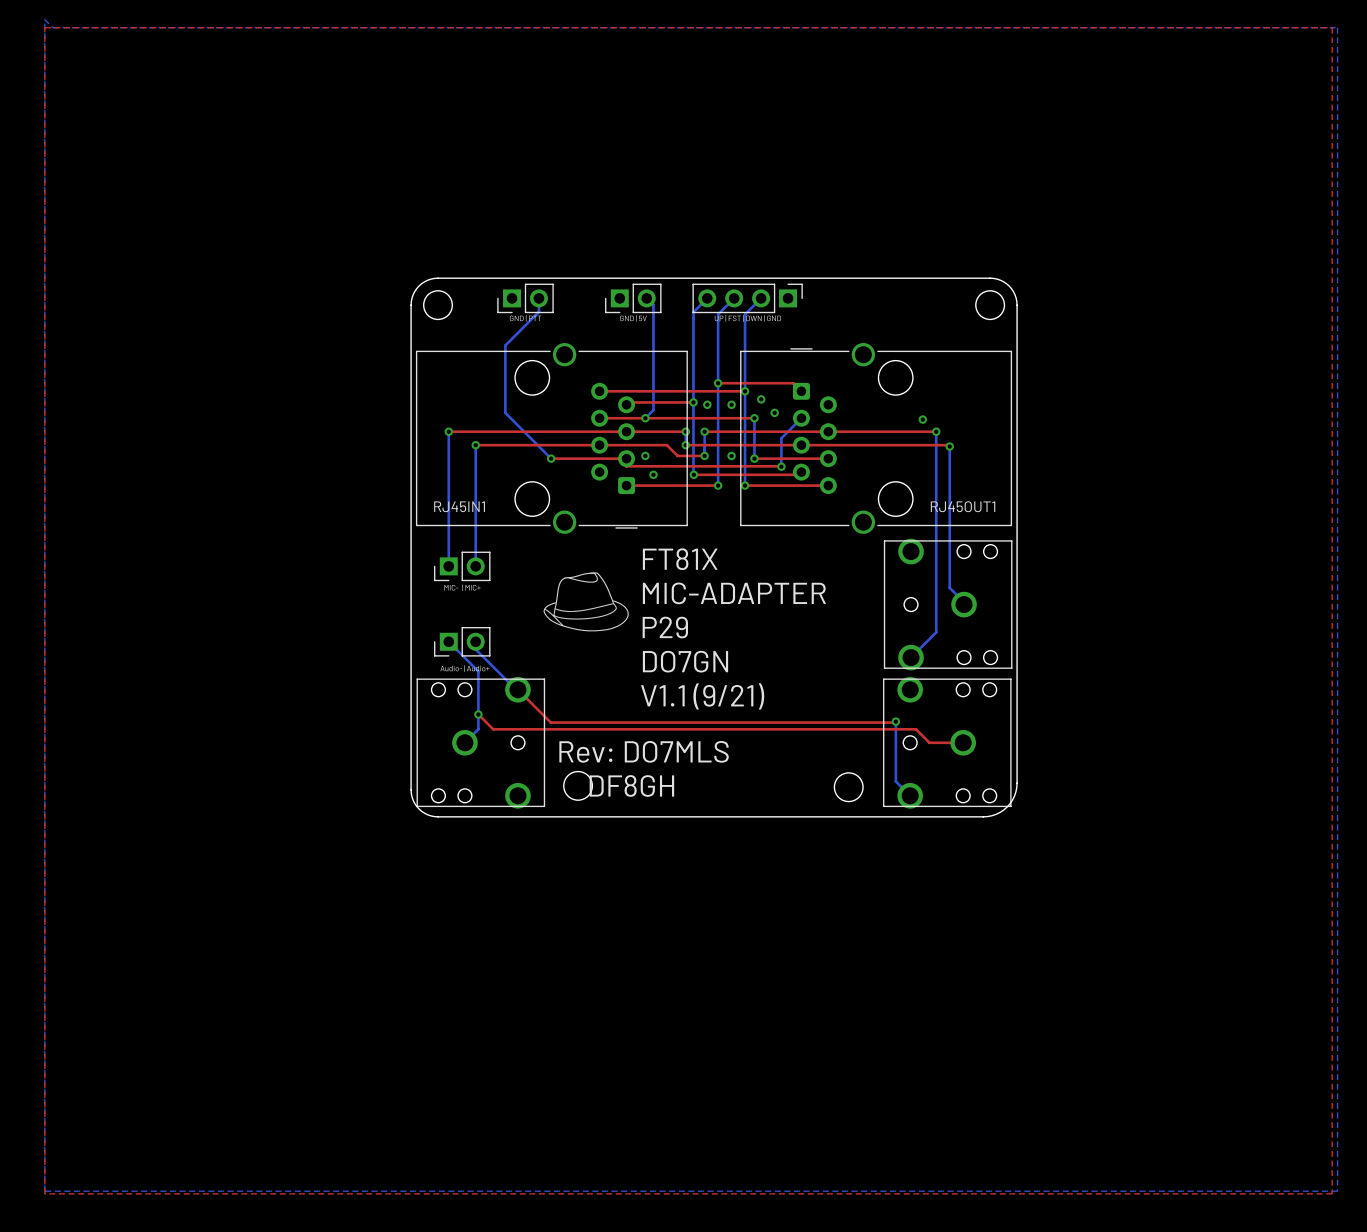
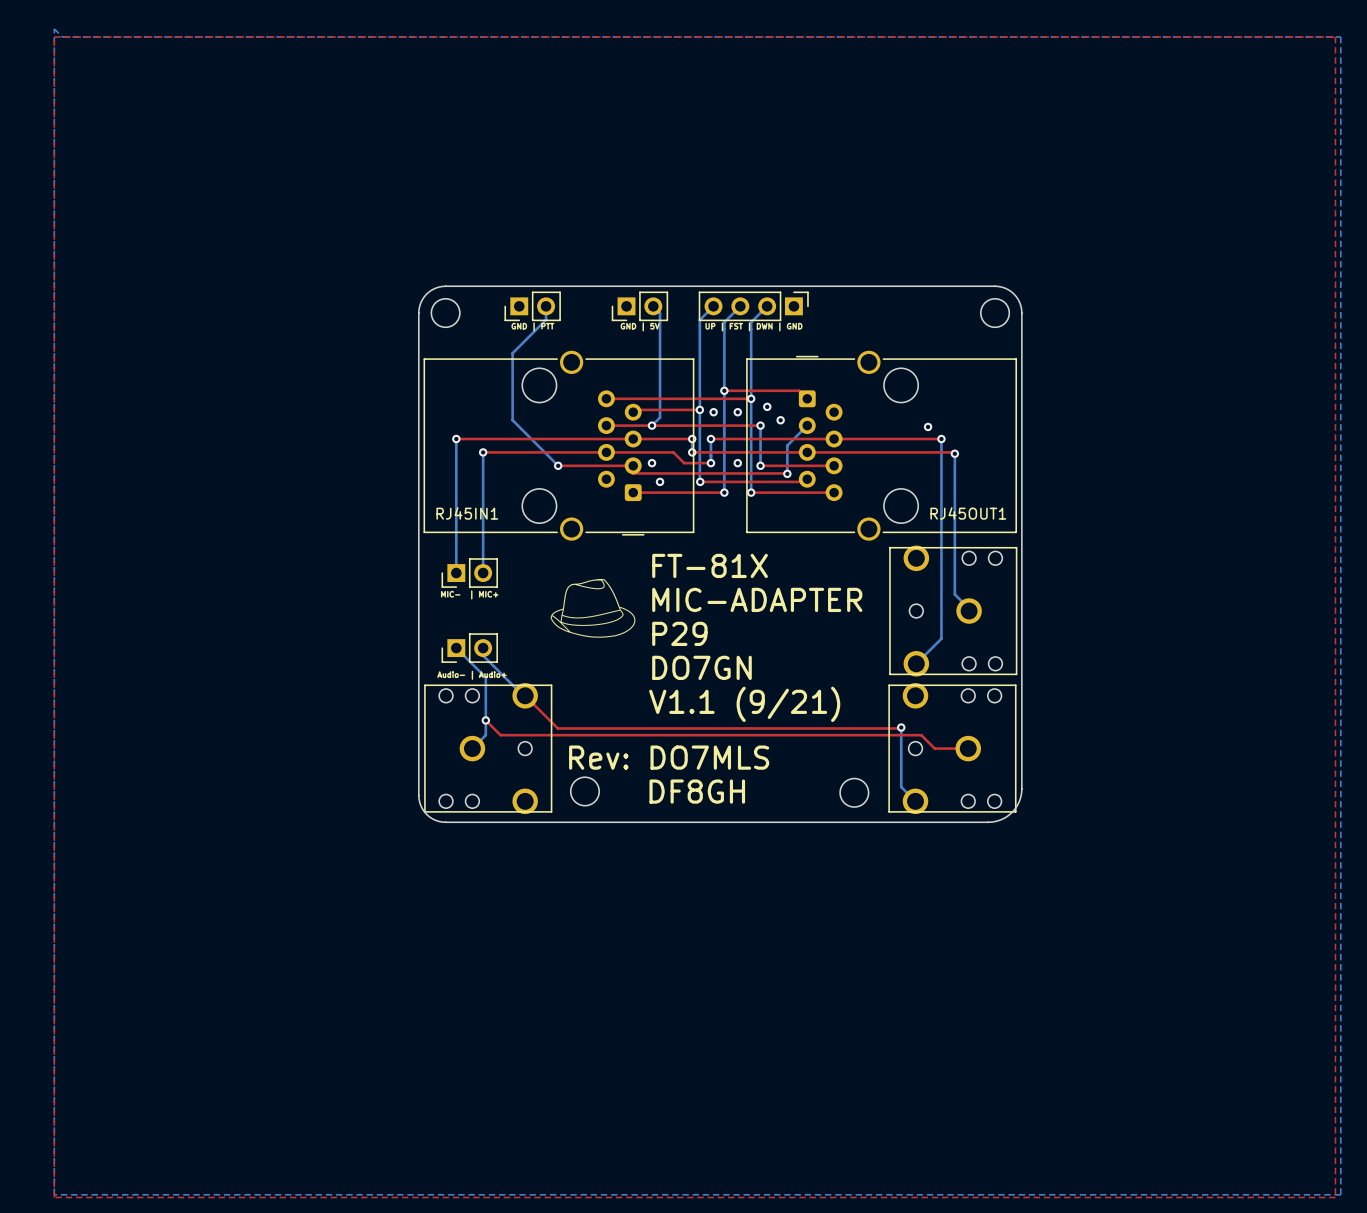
text: FT81X (680, 559) -> FT-81X (710, 565)

